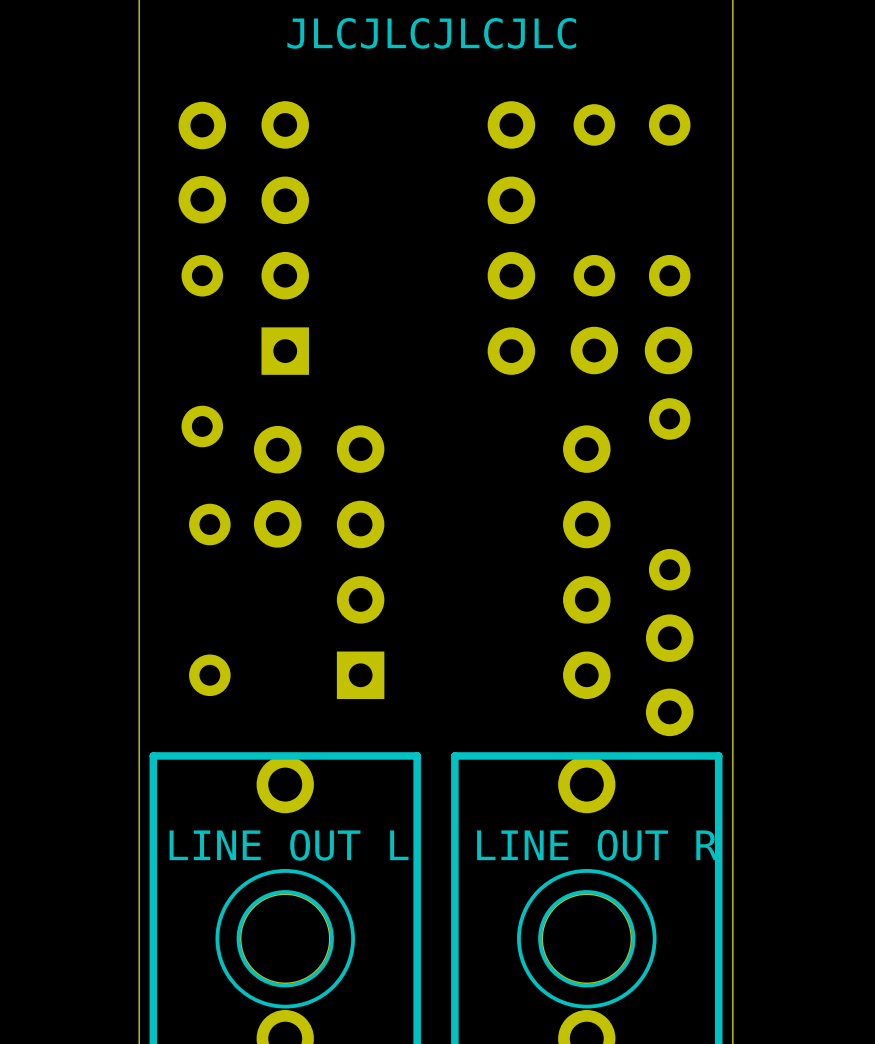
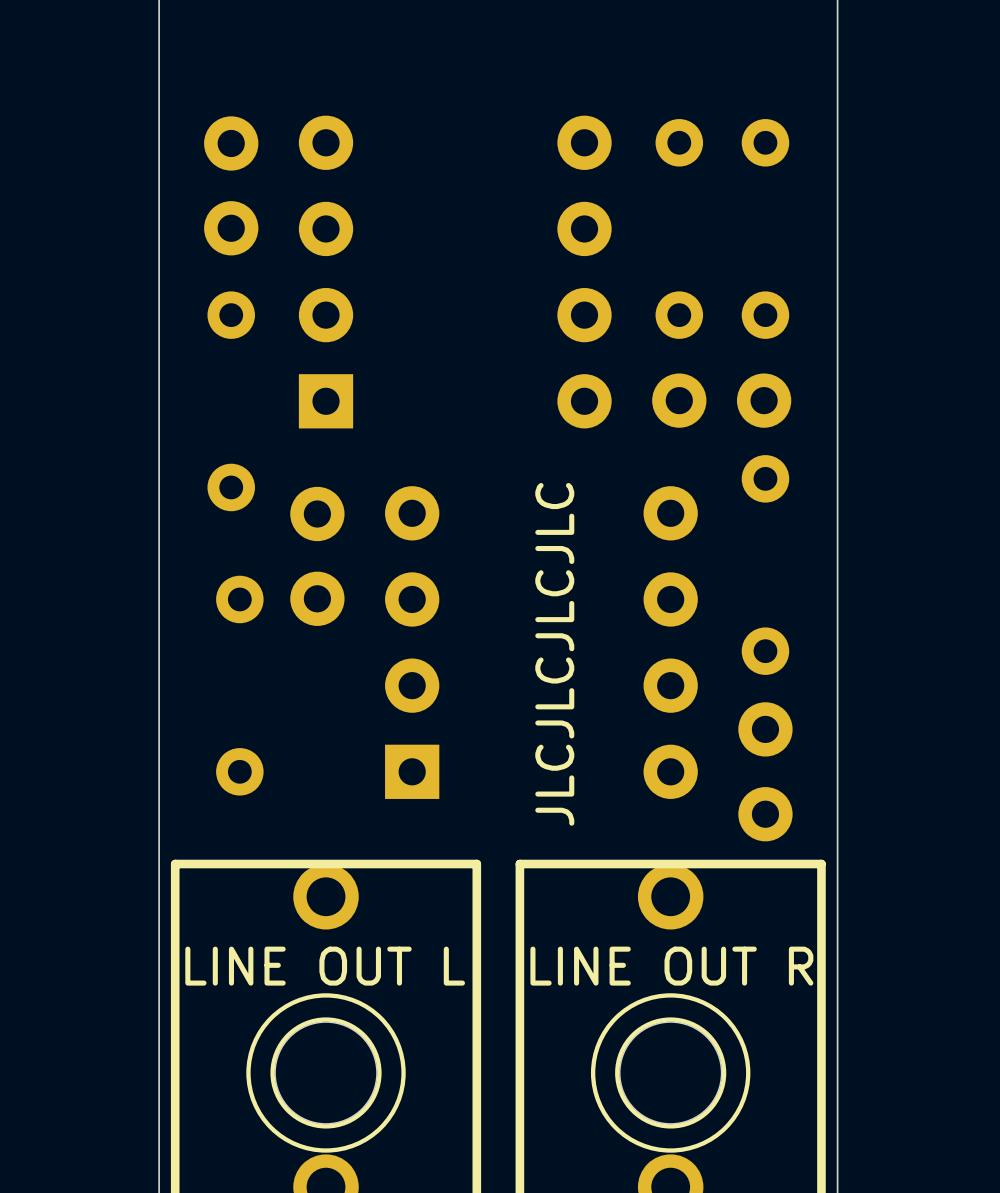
text rotation: 0° (431, 33) -> 90° counterclockwise (554, 654)
text position: JLCJLCJLCJLC (431, 33) -> JLCJLCJLCJLC (554, 654)

